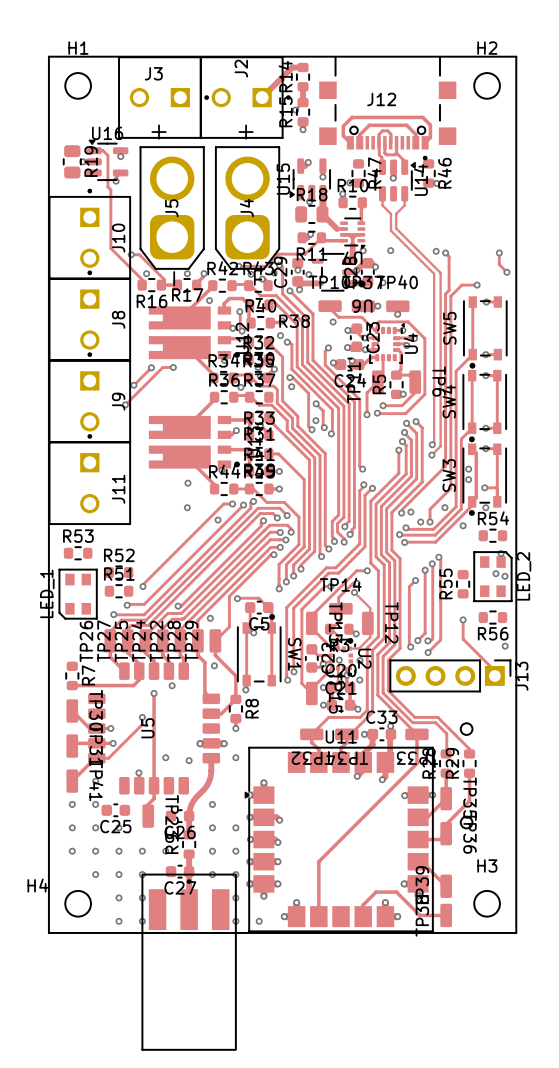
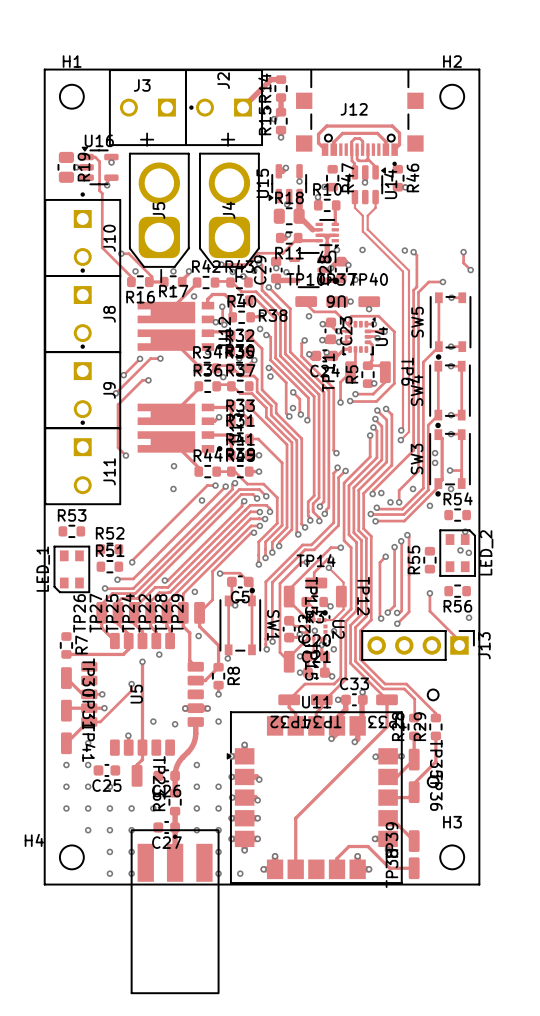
track: none -> (148, 380) (142, 380) (118, 404) (118, 447) (125, 455)
via: none -> (148, 380)
via: (221, 470) -> none
via: none -> (125, 455)

